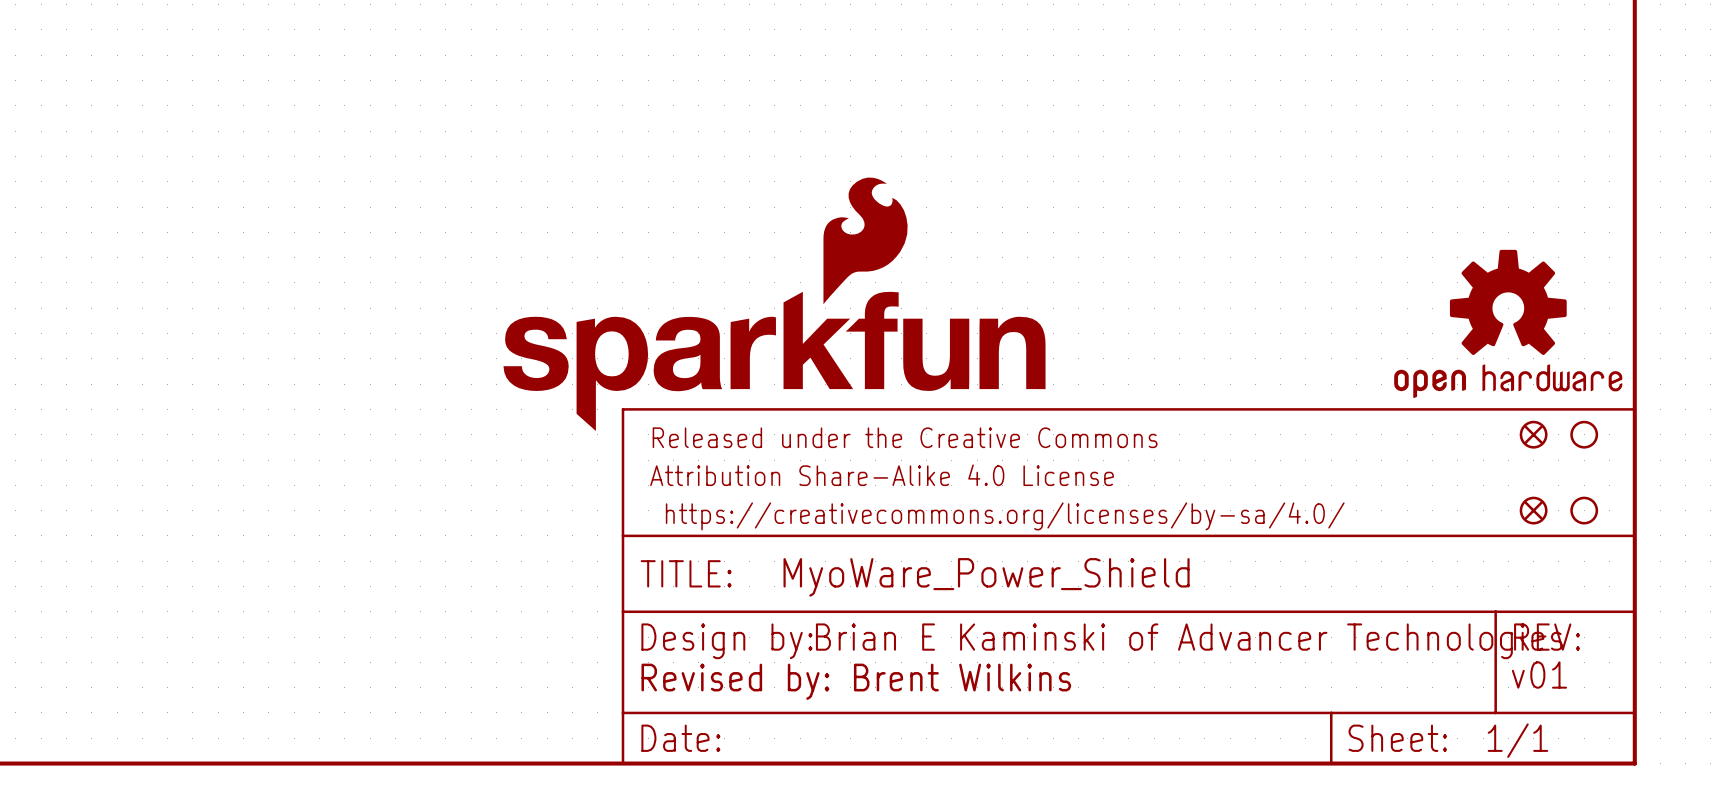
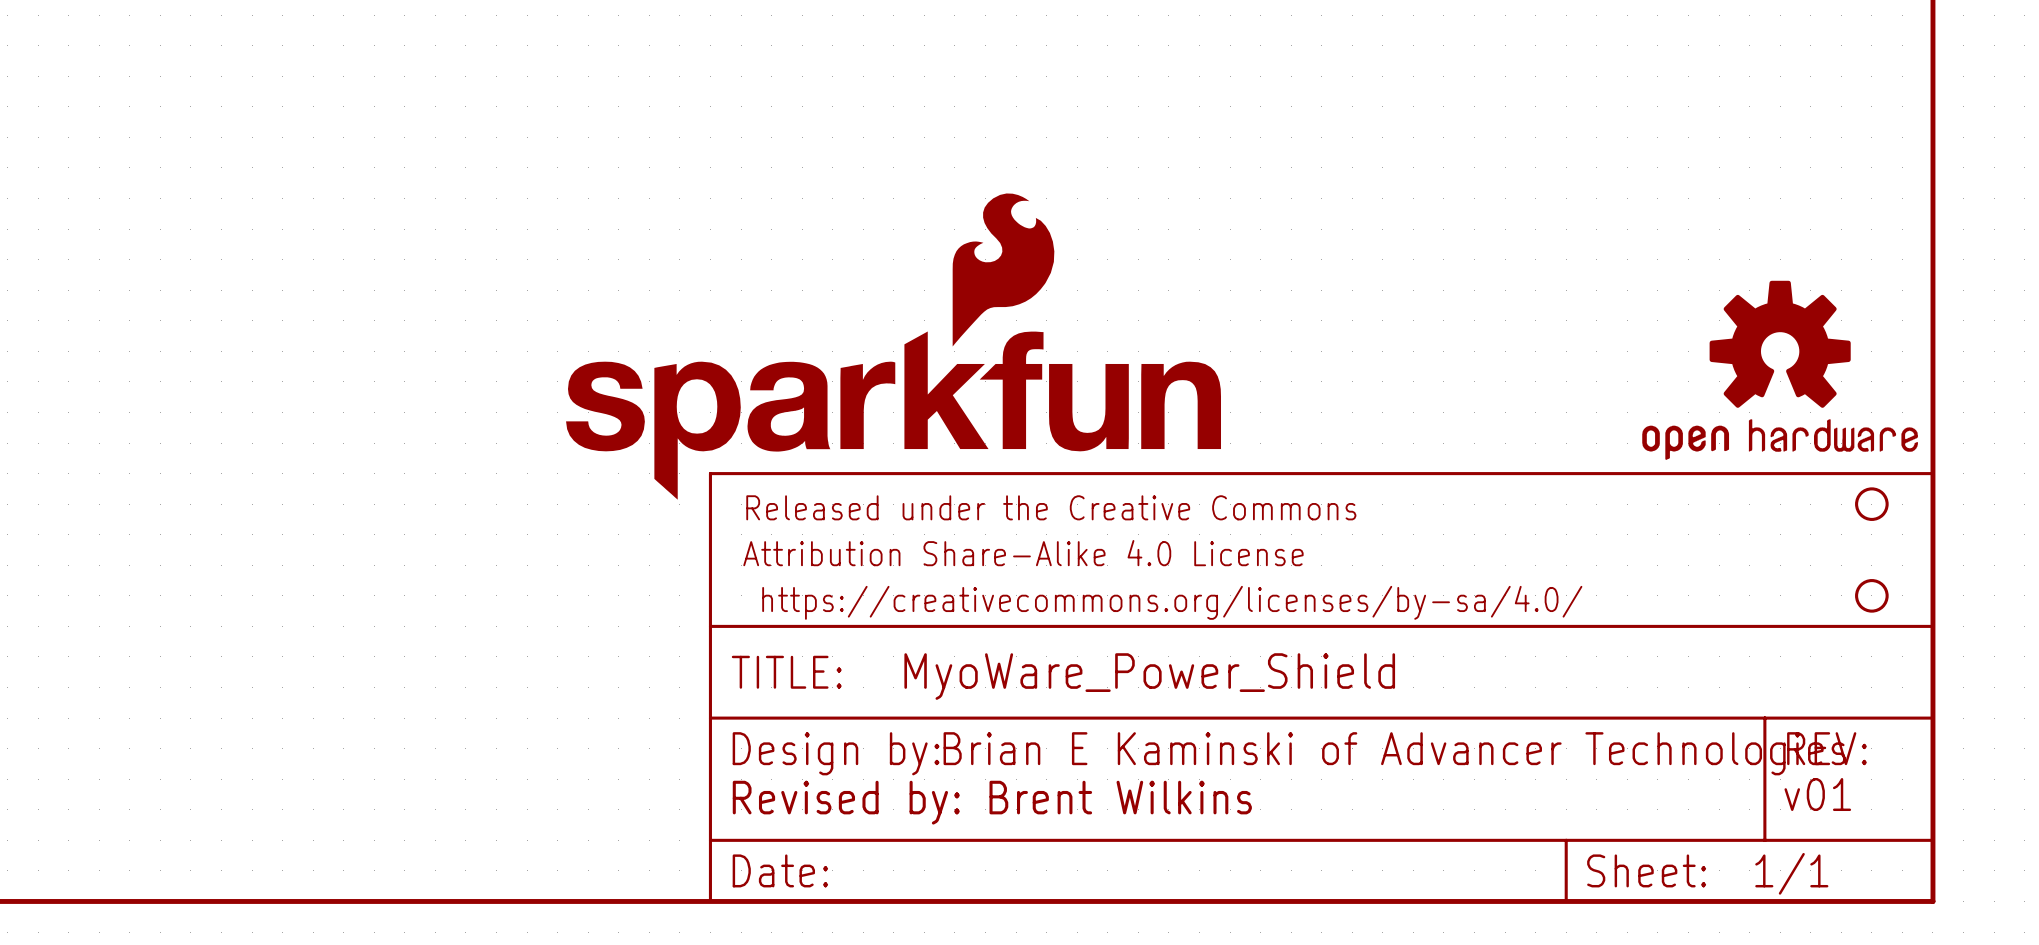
part: (1533, 434) -> none
part: (1533, 510) -> none

